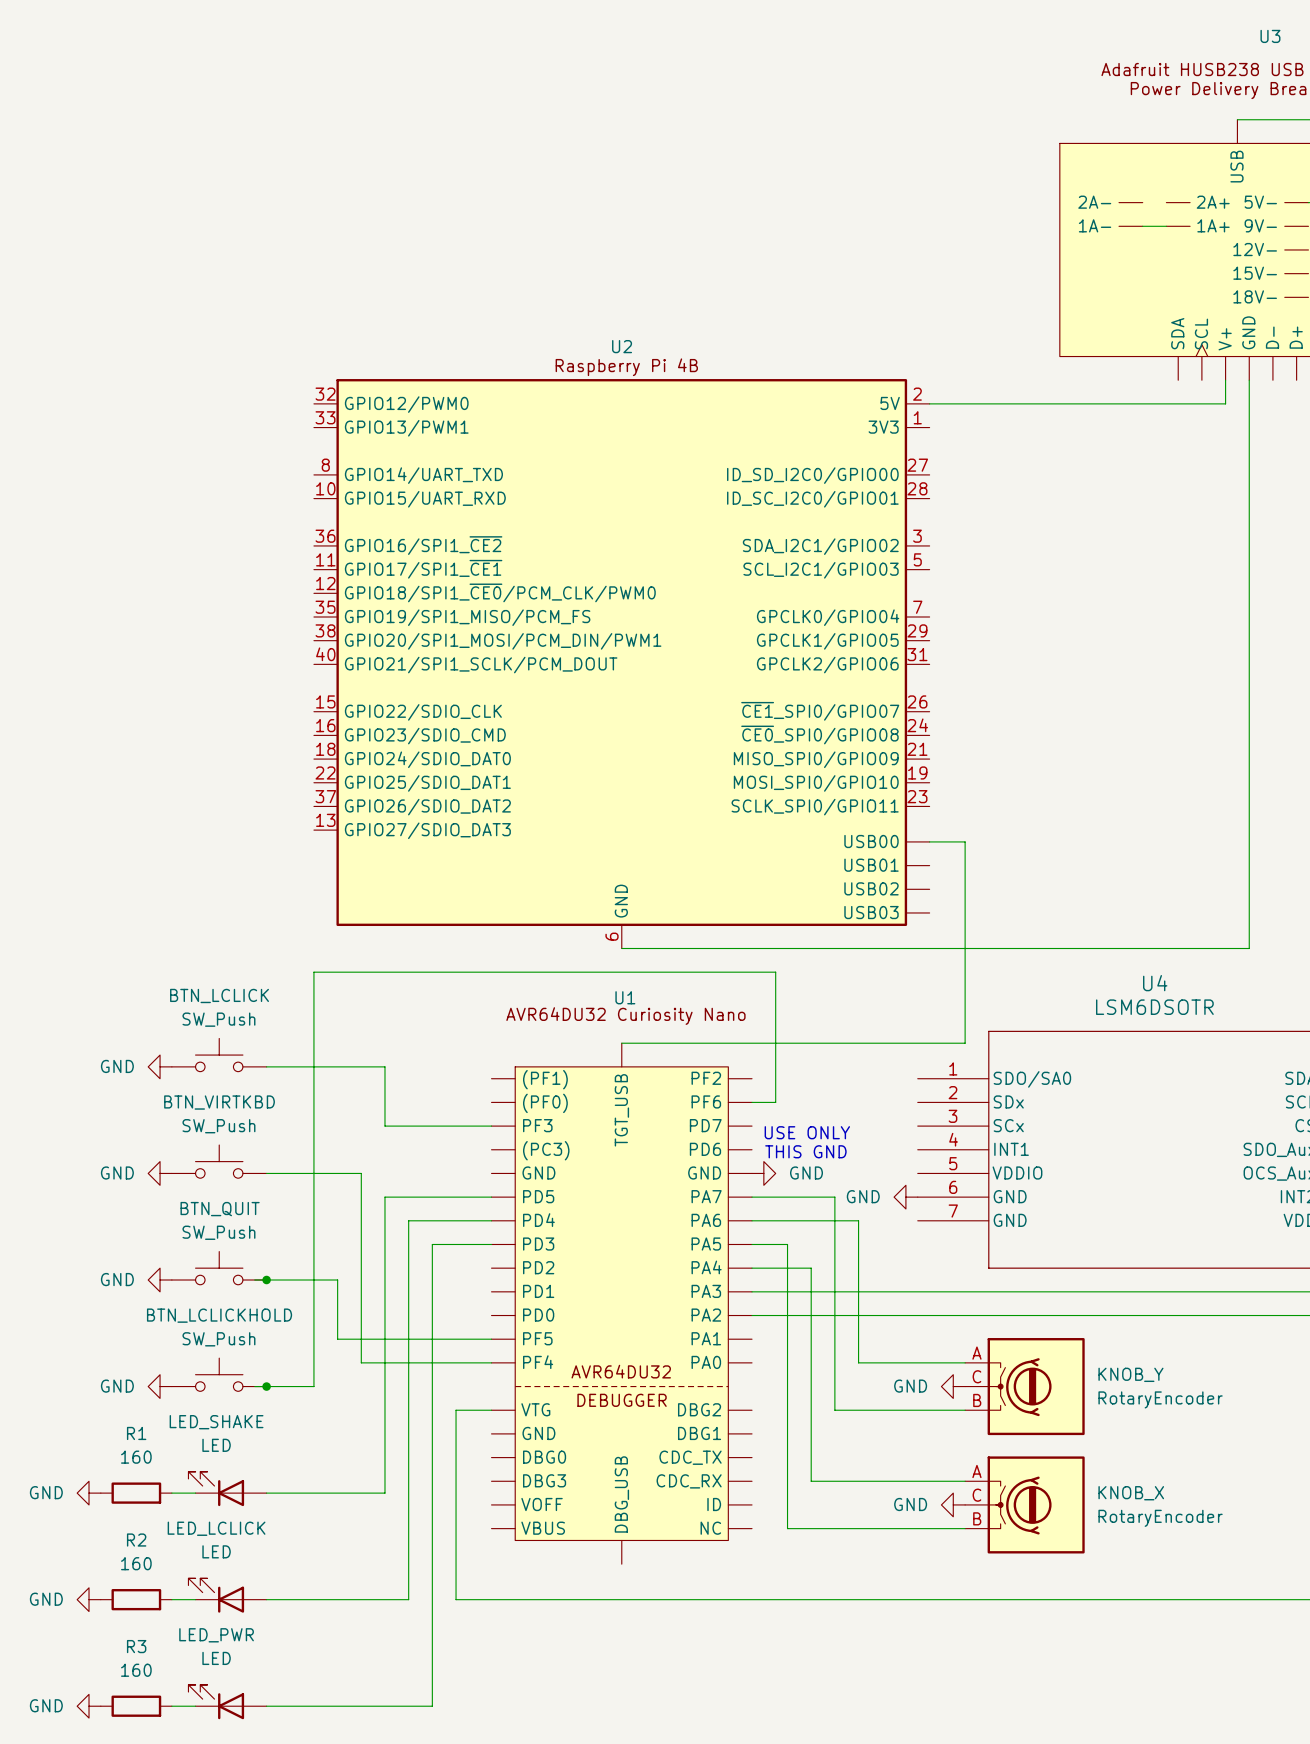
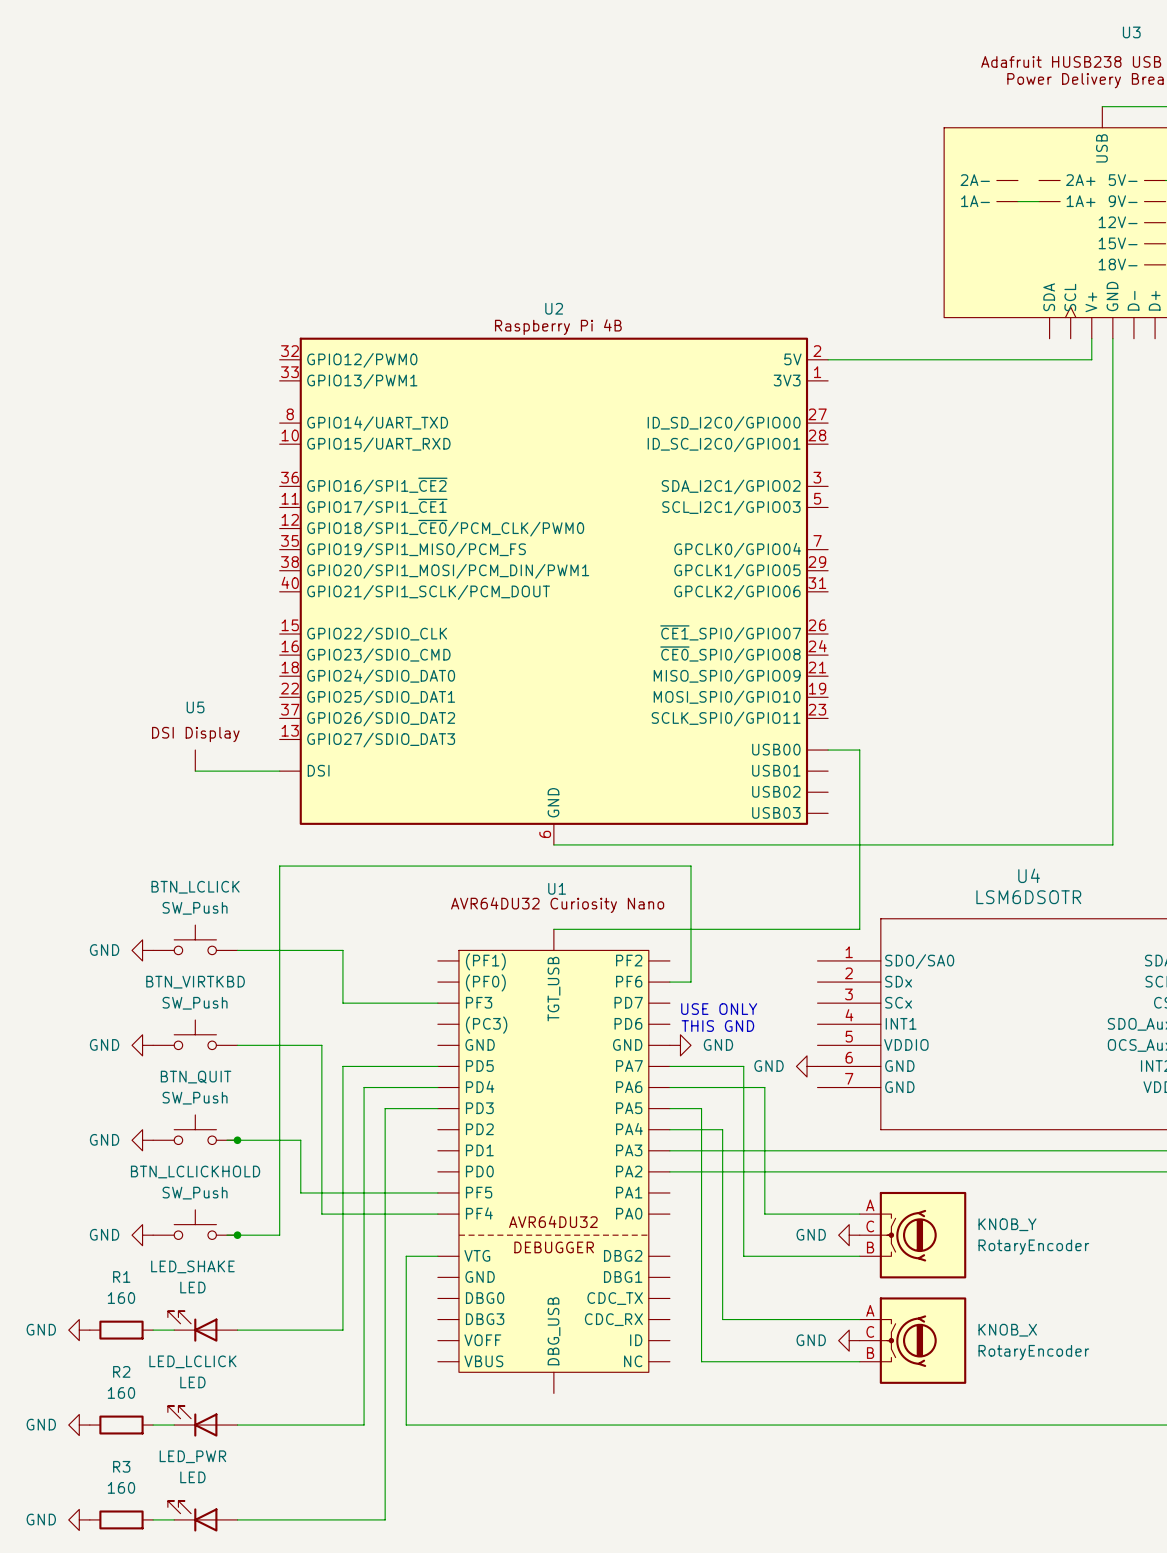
U2 symbol: [313, 379, 930, 949] -> [279, 337, 829, 845]
U5: none -> (195, 760)
wire: none -> (195, 771) (279, 771)

